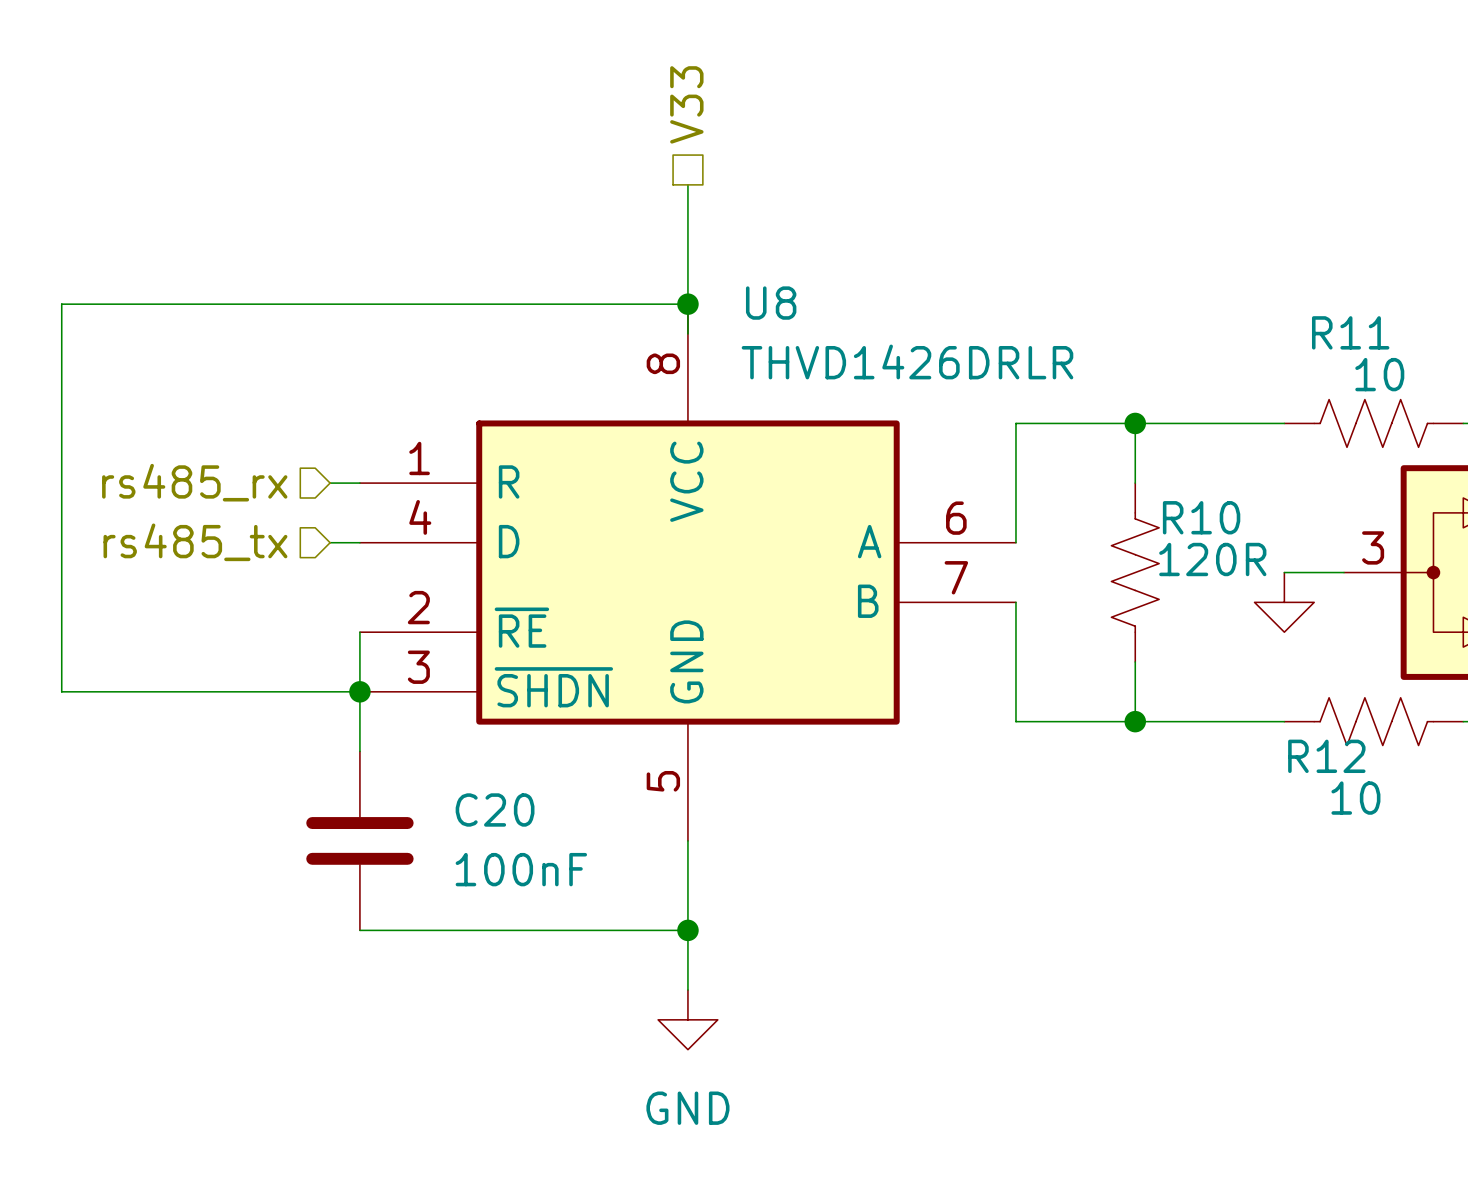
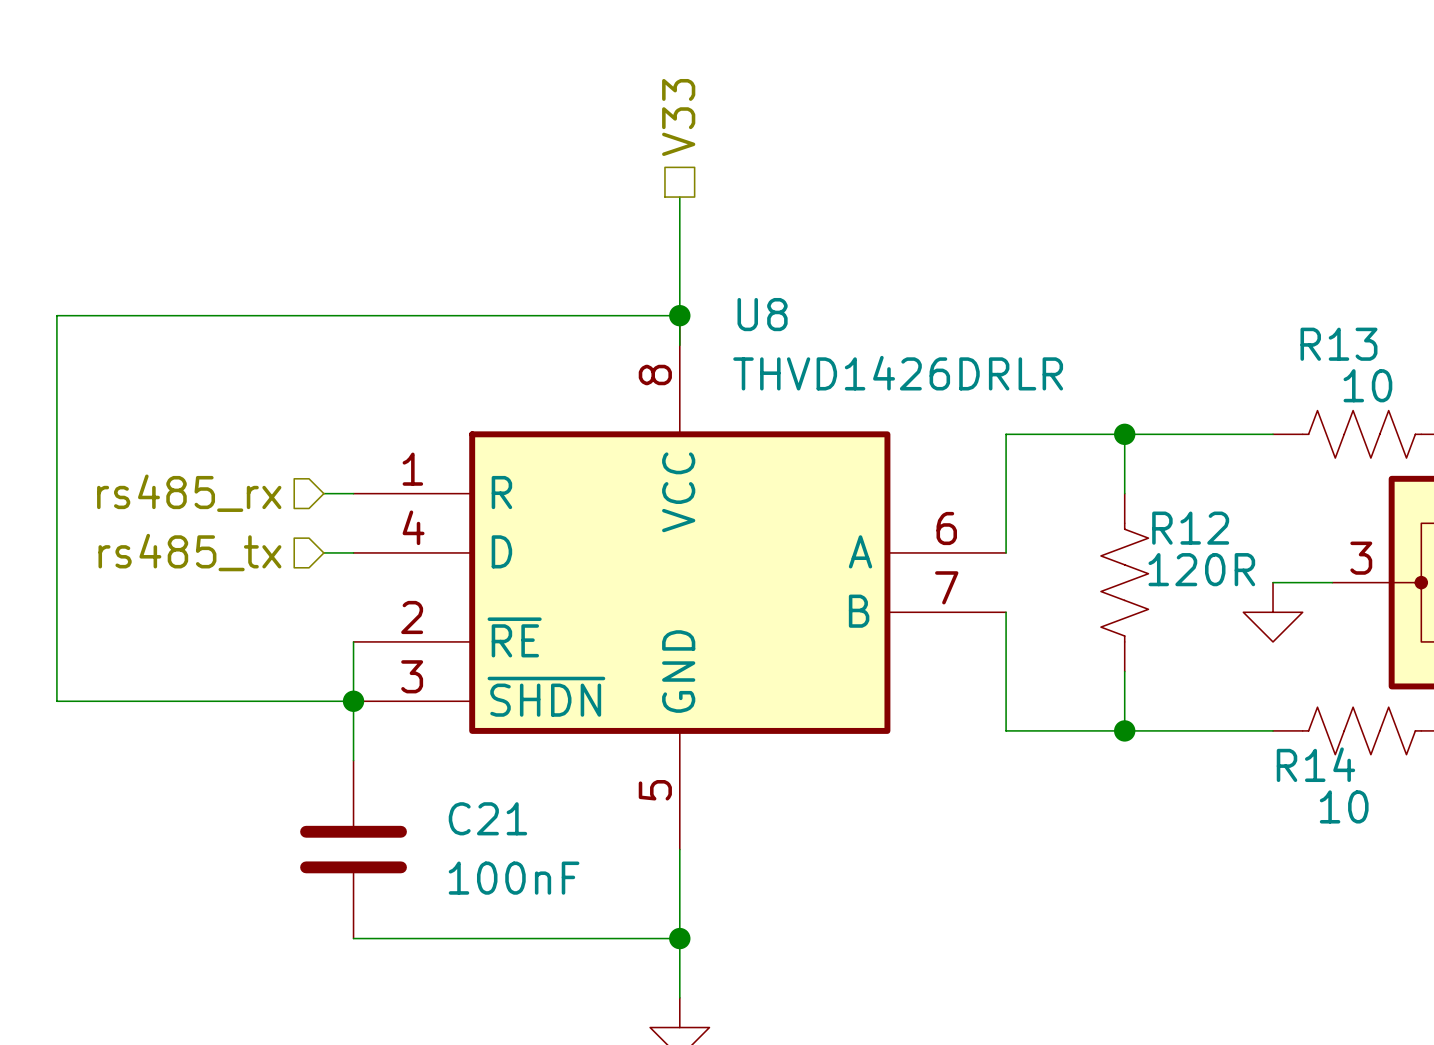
R11 name: R11 (1350, 332) -> R13 (1338, 344)
R10 name: R10 (1201, 517) -> R12 (1190, 528)
R12 name: R12 (1326, 756) -> R14 (1315, 764)
C20 name: C20 (495, 809) -> C21 (487, 818)

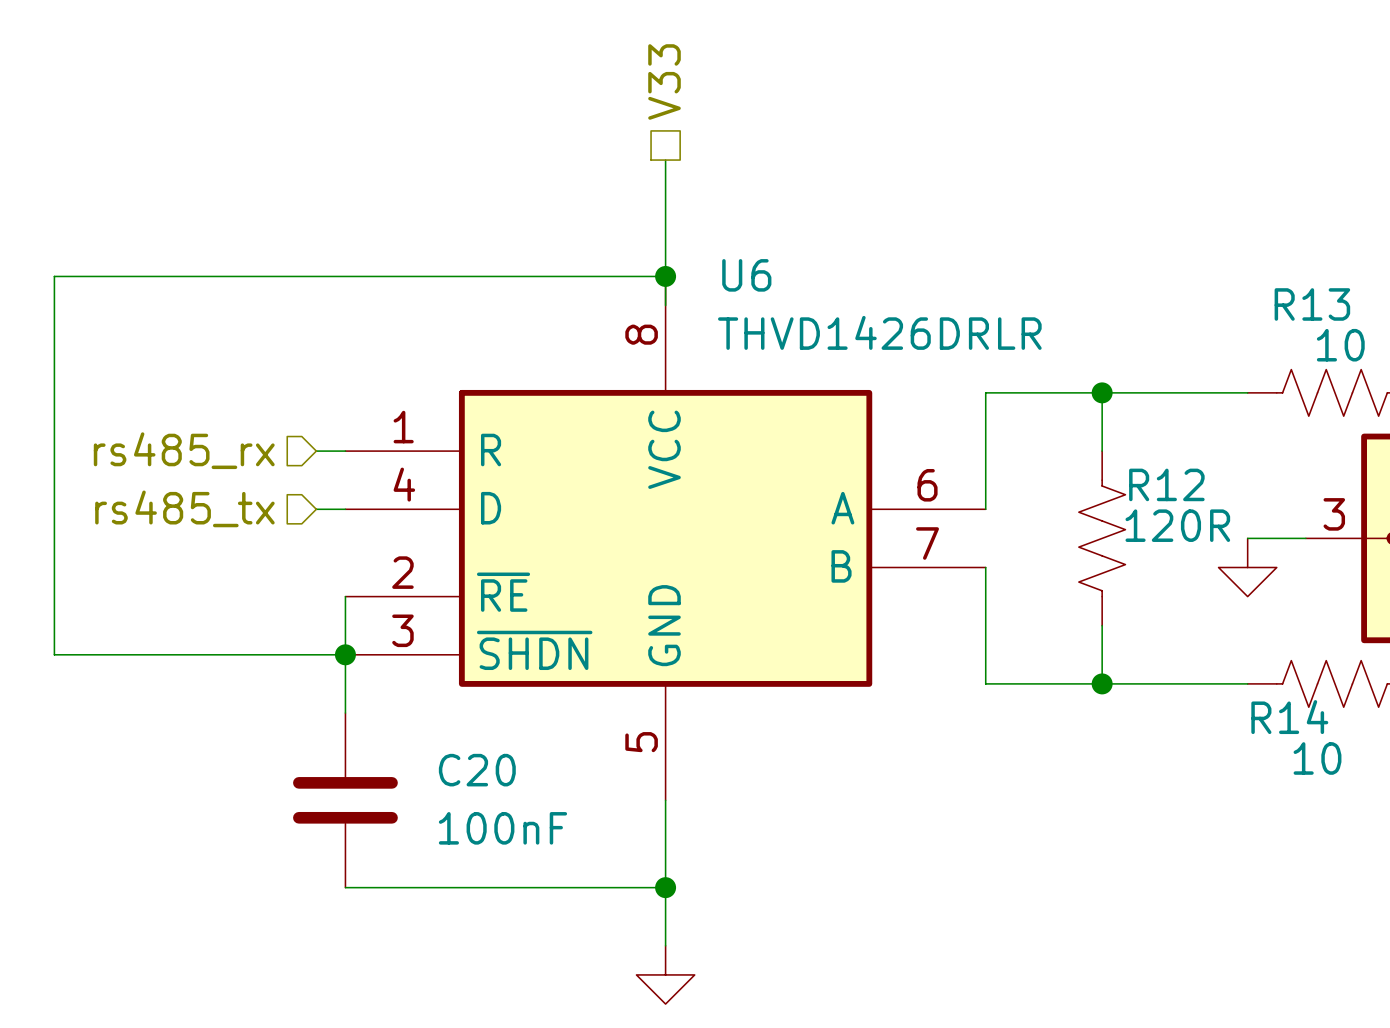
U8 name: U8 (762, 314) -> U6 (746, 275)
C21 name: C21 (487, 818) -> C20 (477, 770)

